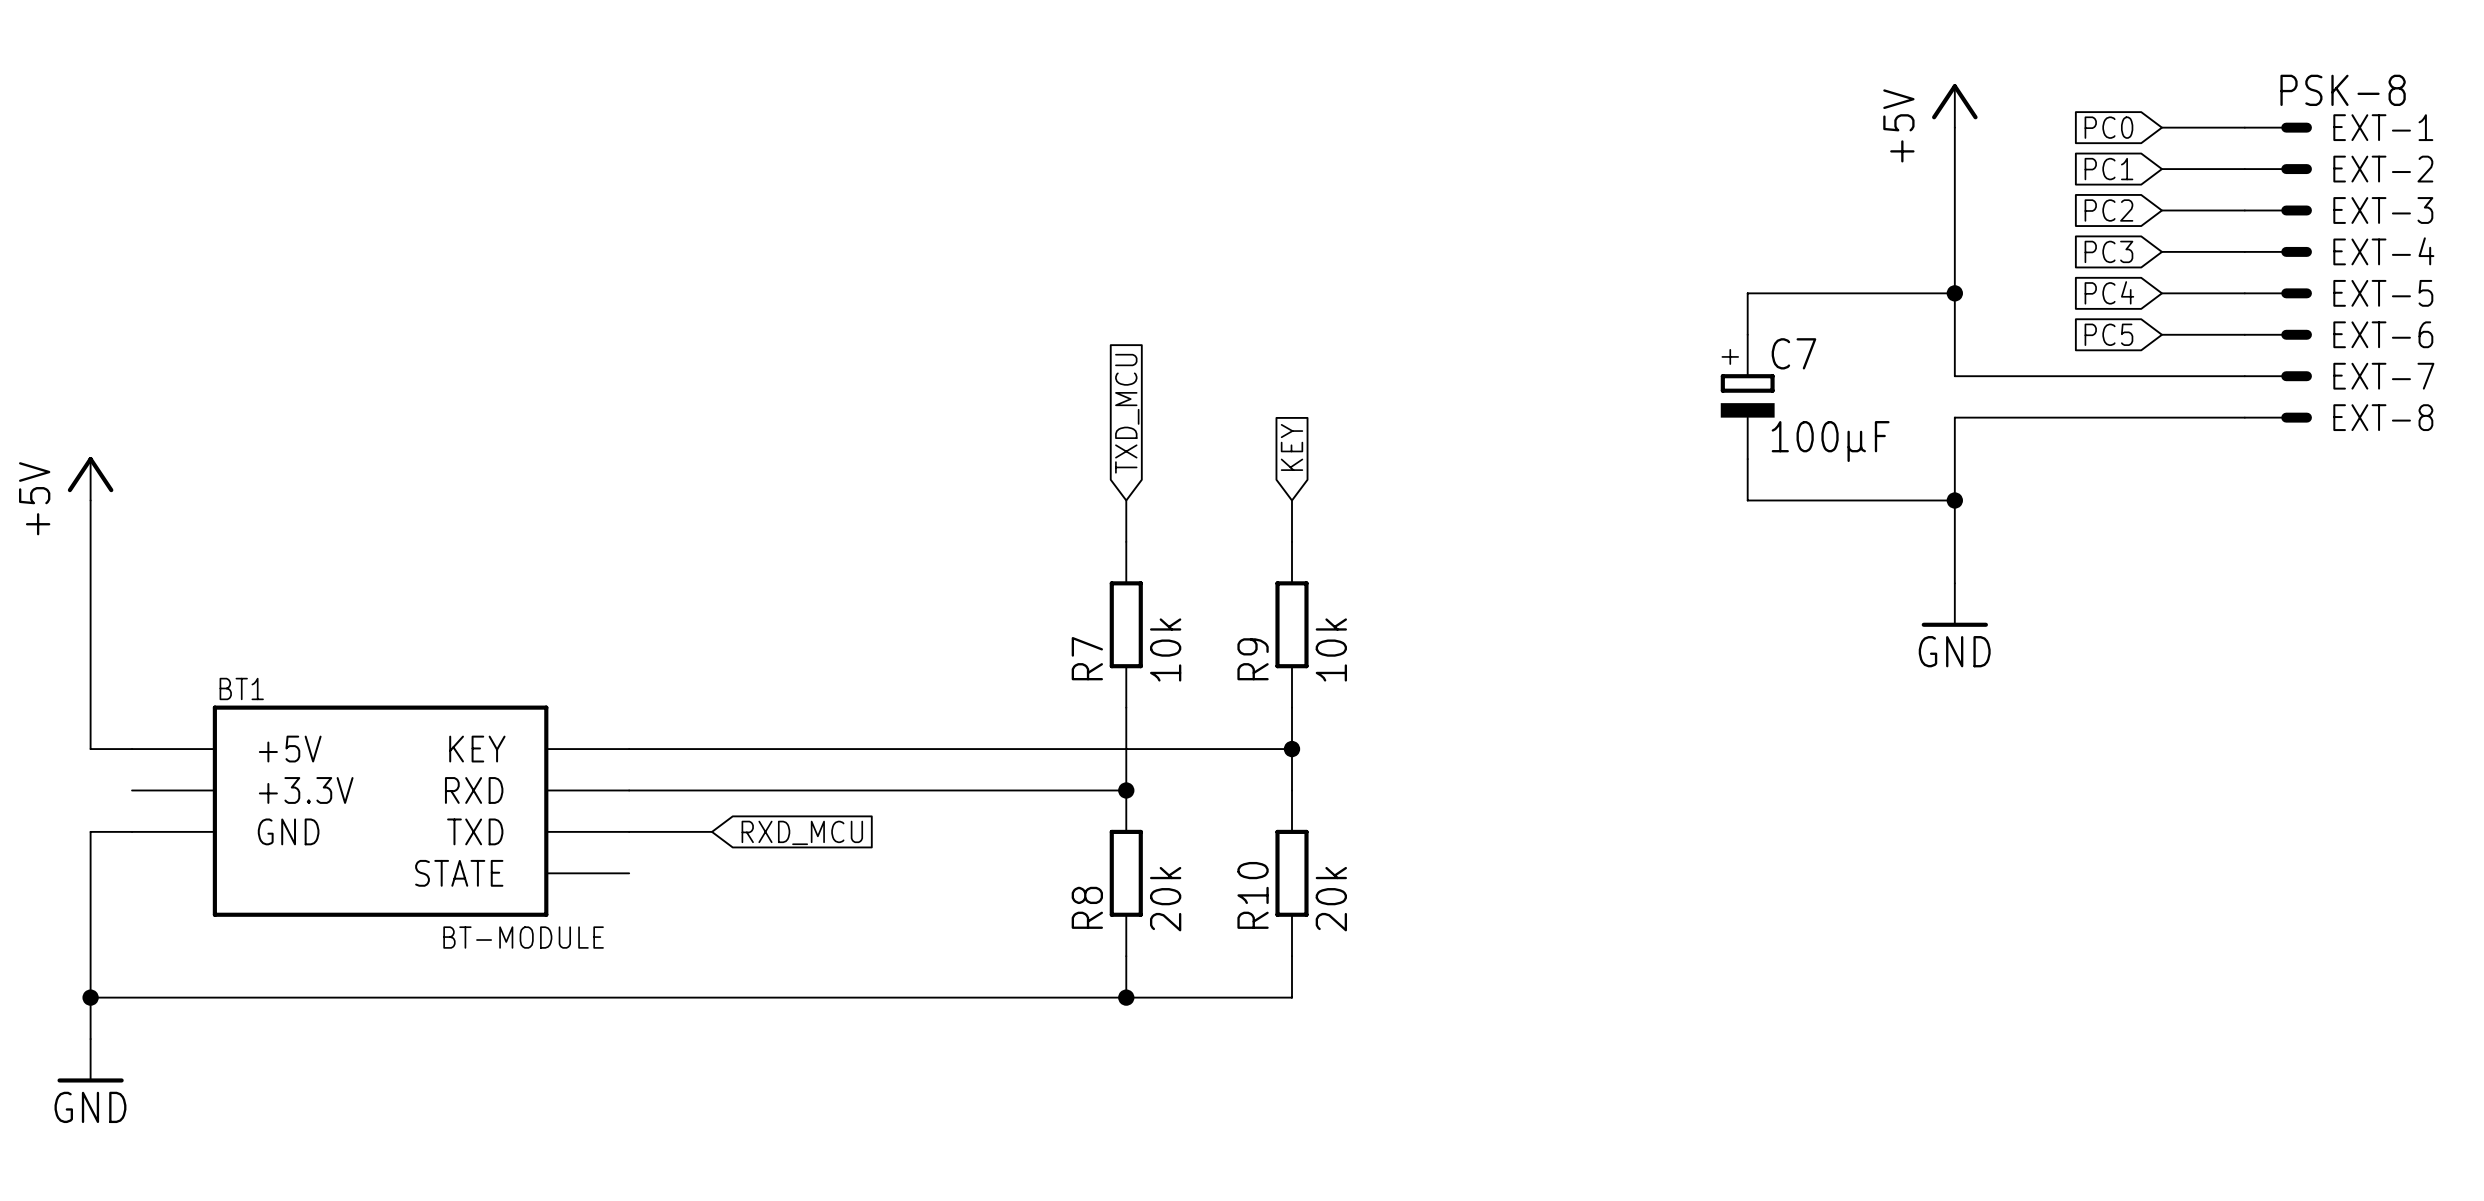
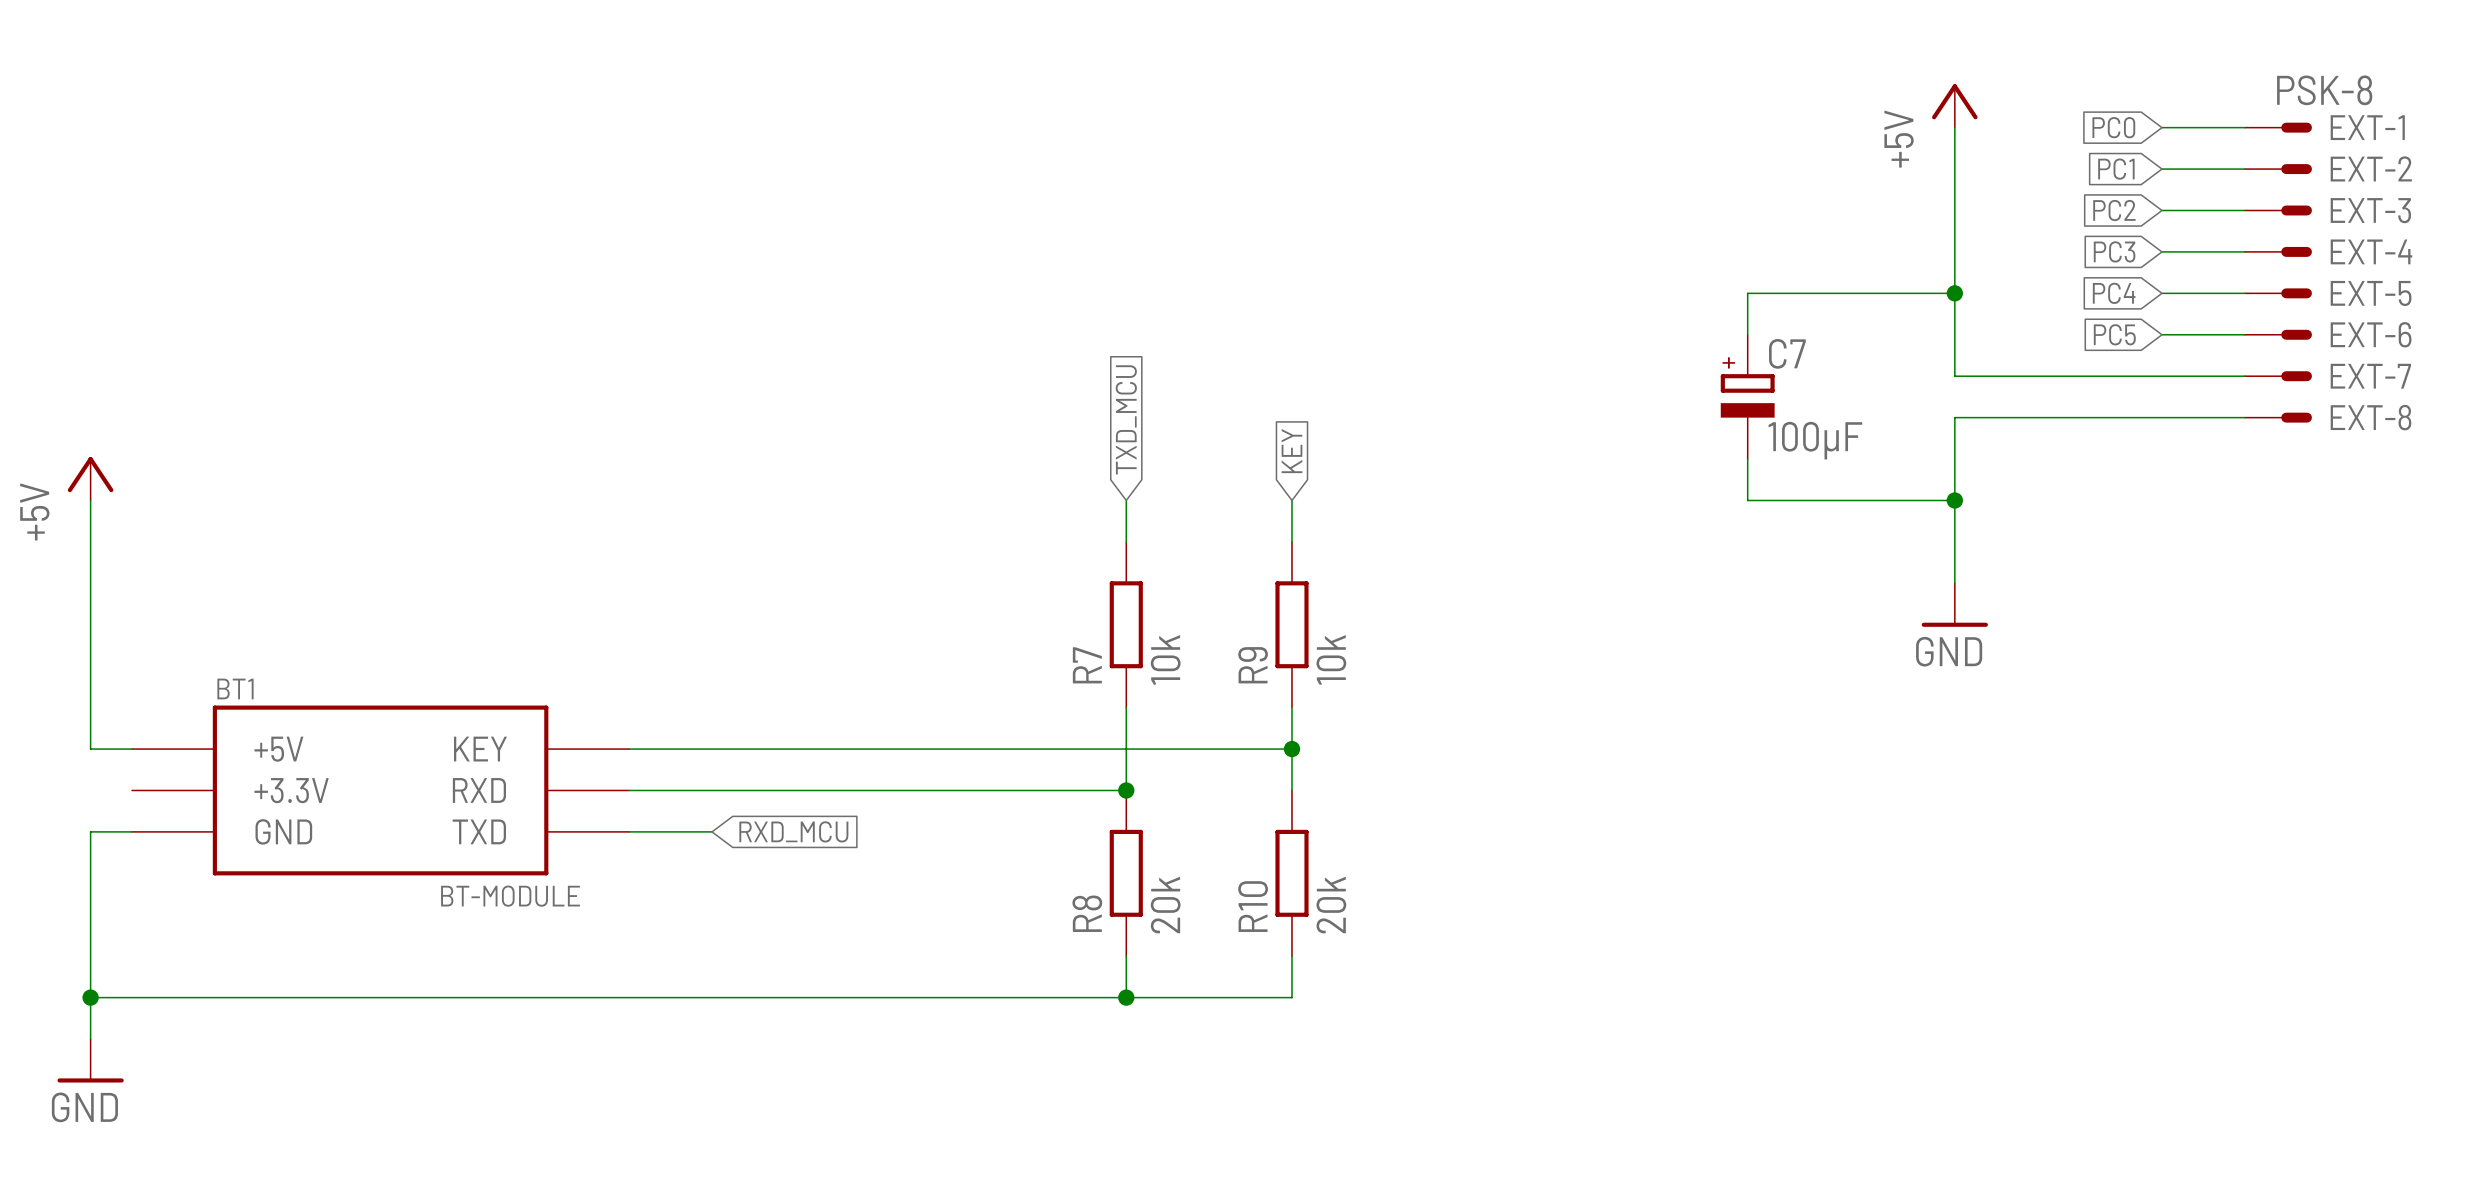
BT1 symbol: [132, 705, 630, 917] -> [132, 705, 630, 876]

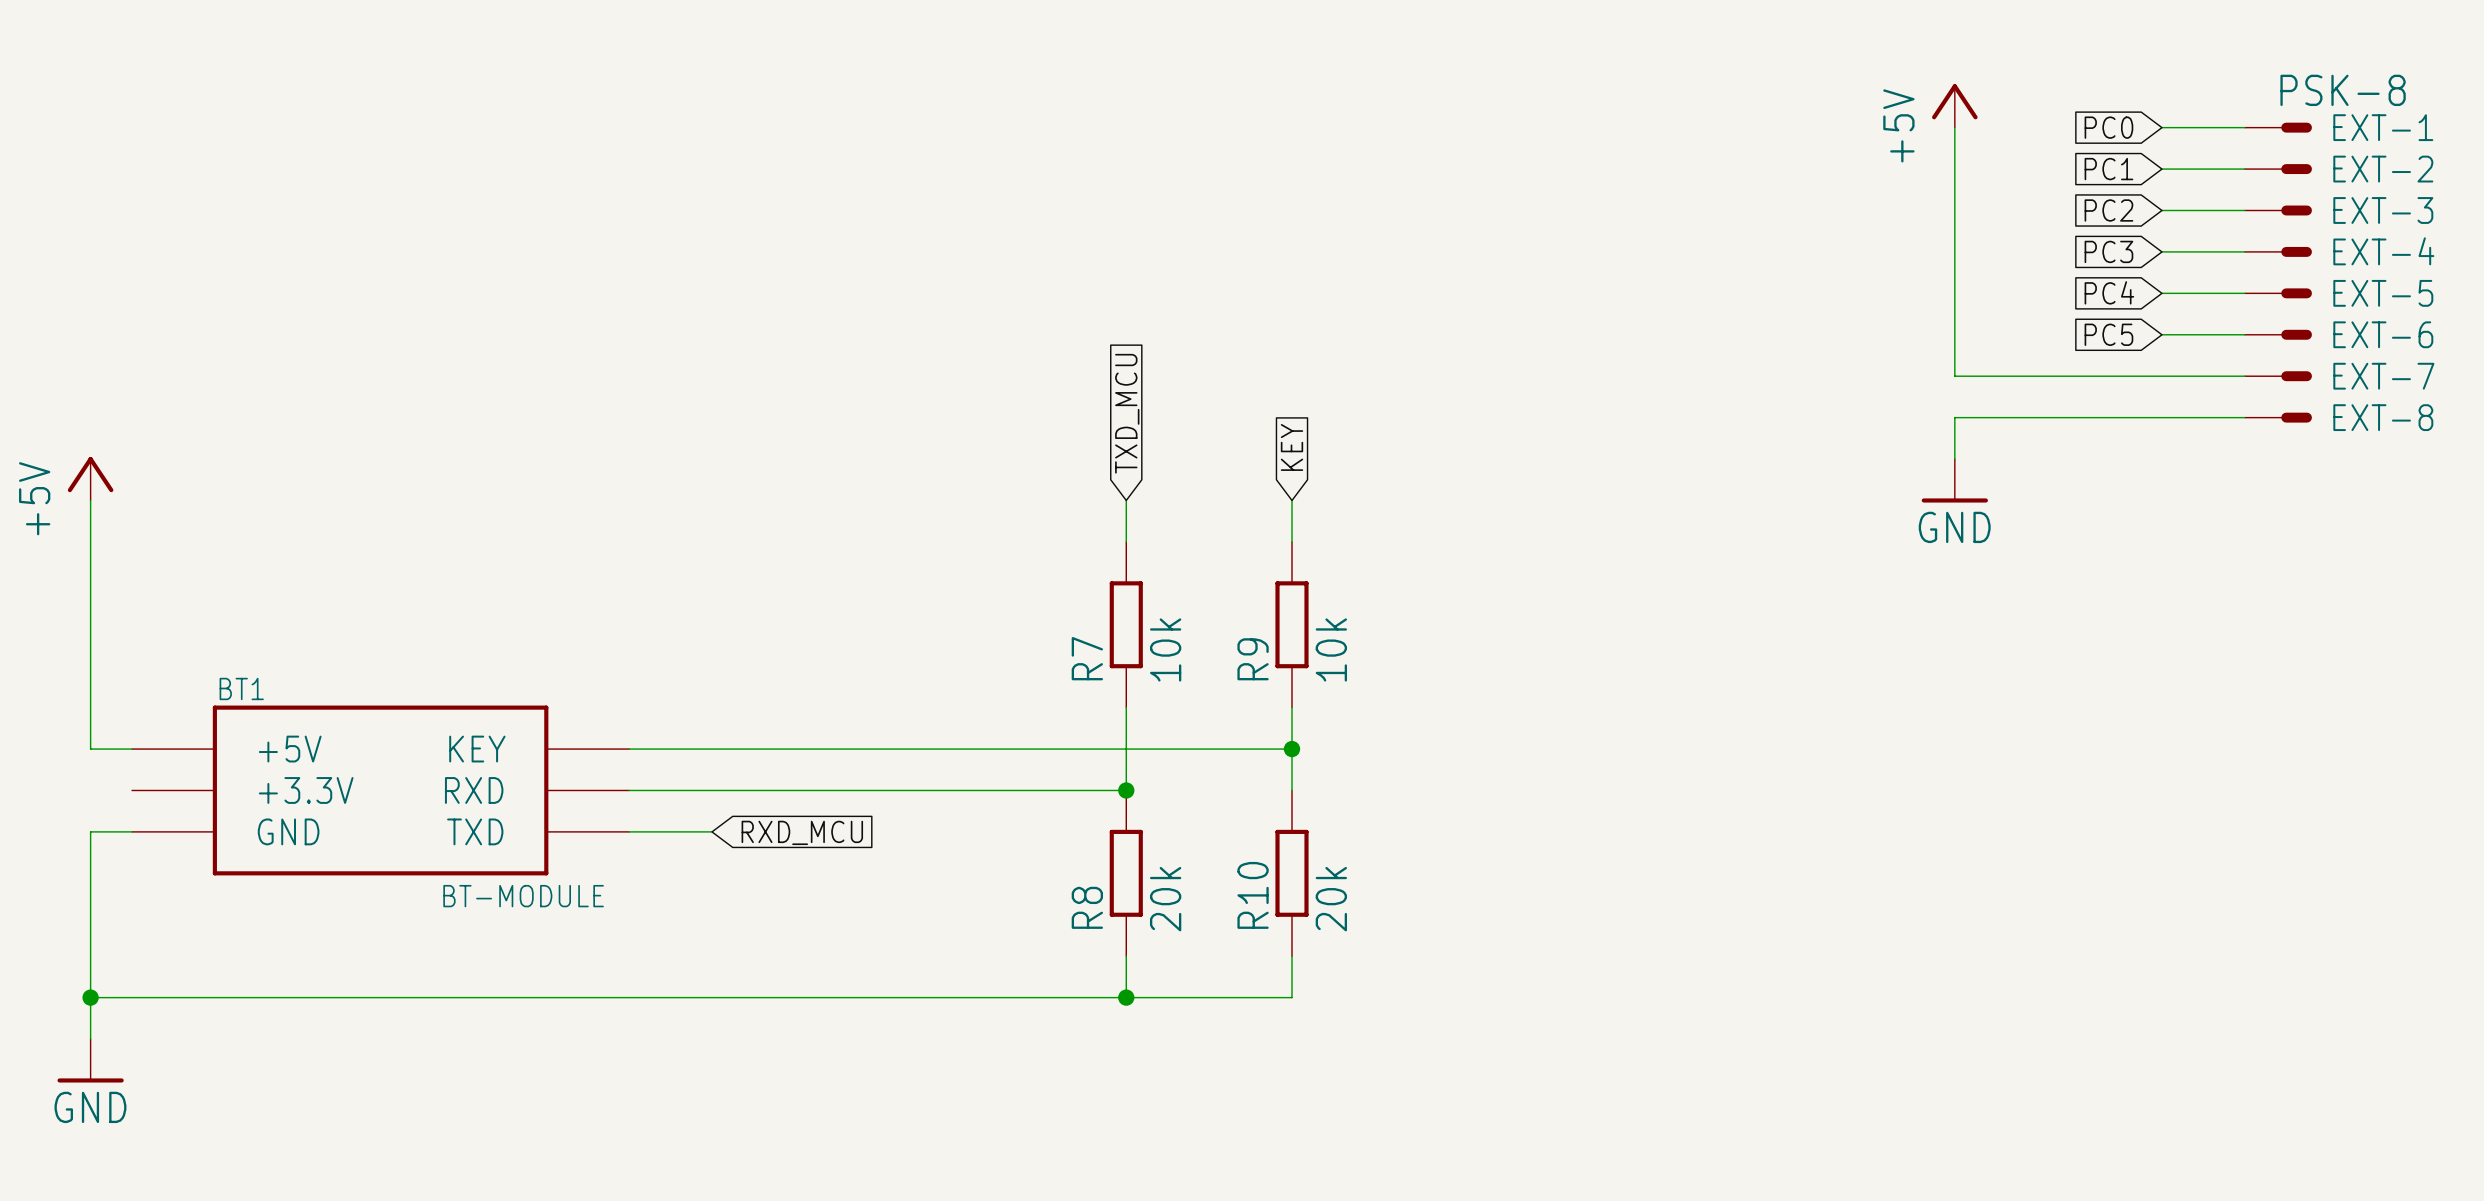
wire: (1954, 293) (1747, 293) (1747, 334) -> none
junction: (1954, 293) -> none
C7: 100µF (1747, 396) -> none
wire: (1747, 459) (1747, 500) (1954, 500) -> none
wire: (1954, 459) (1954, 583) -> none
junction: (1954, 500) -> none
power symbol position: GND (1954, 605) -> GND (1954, 480)

